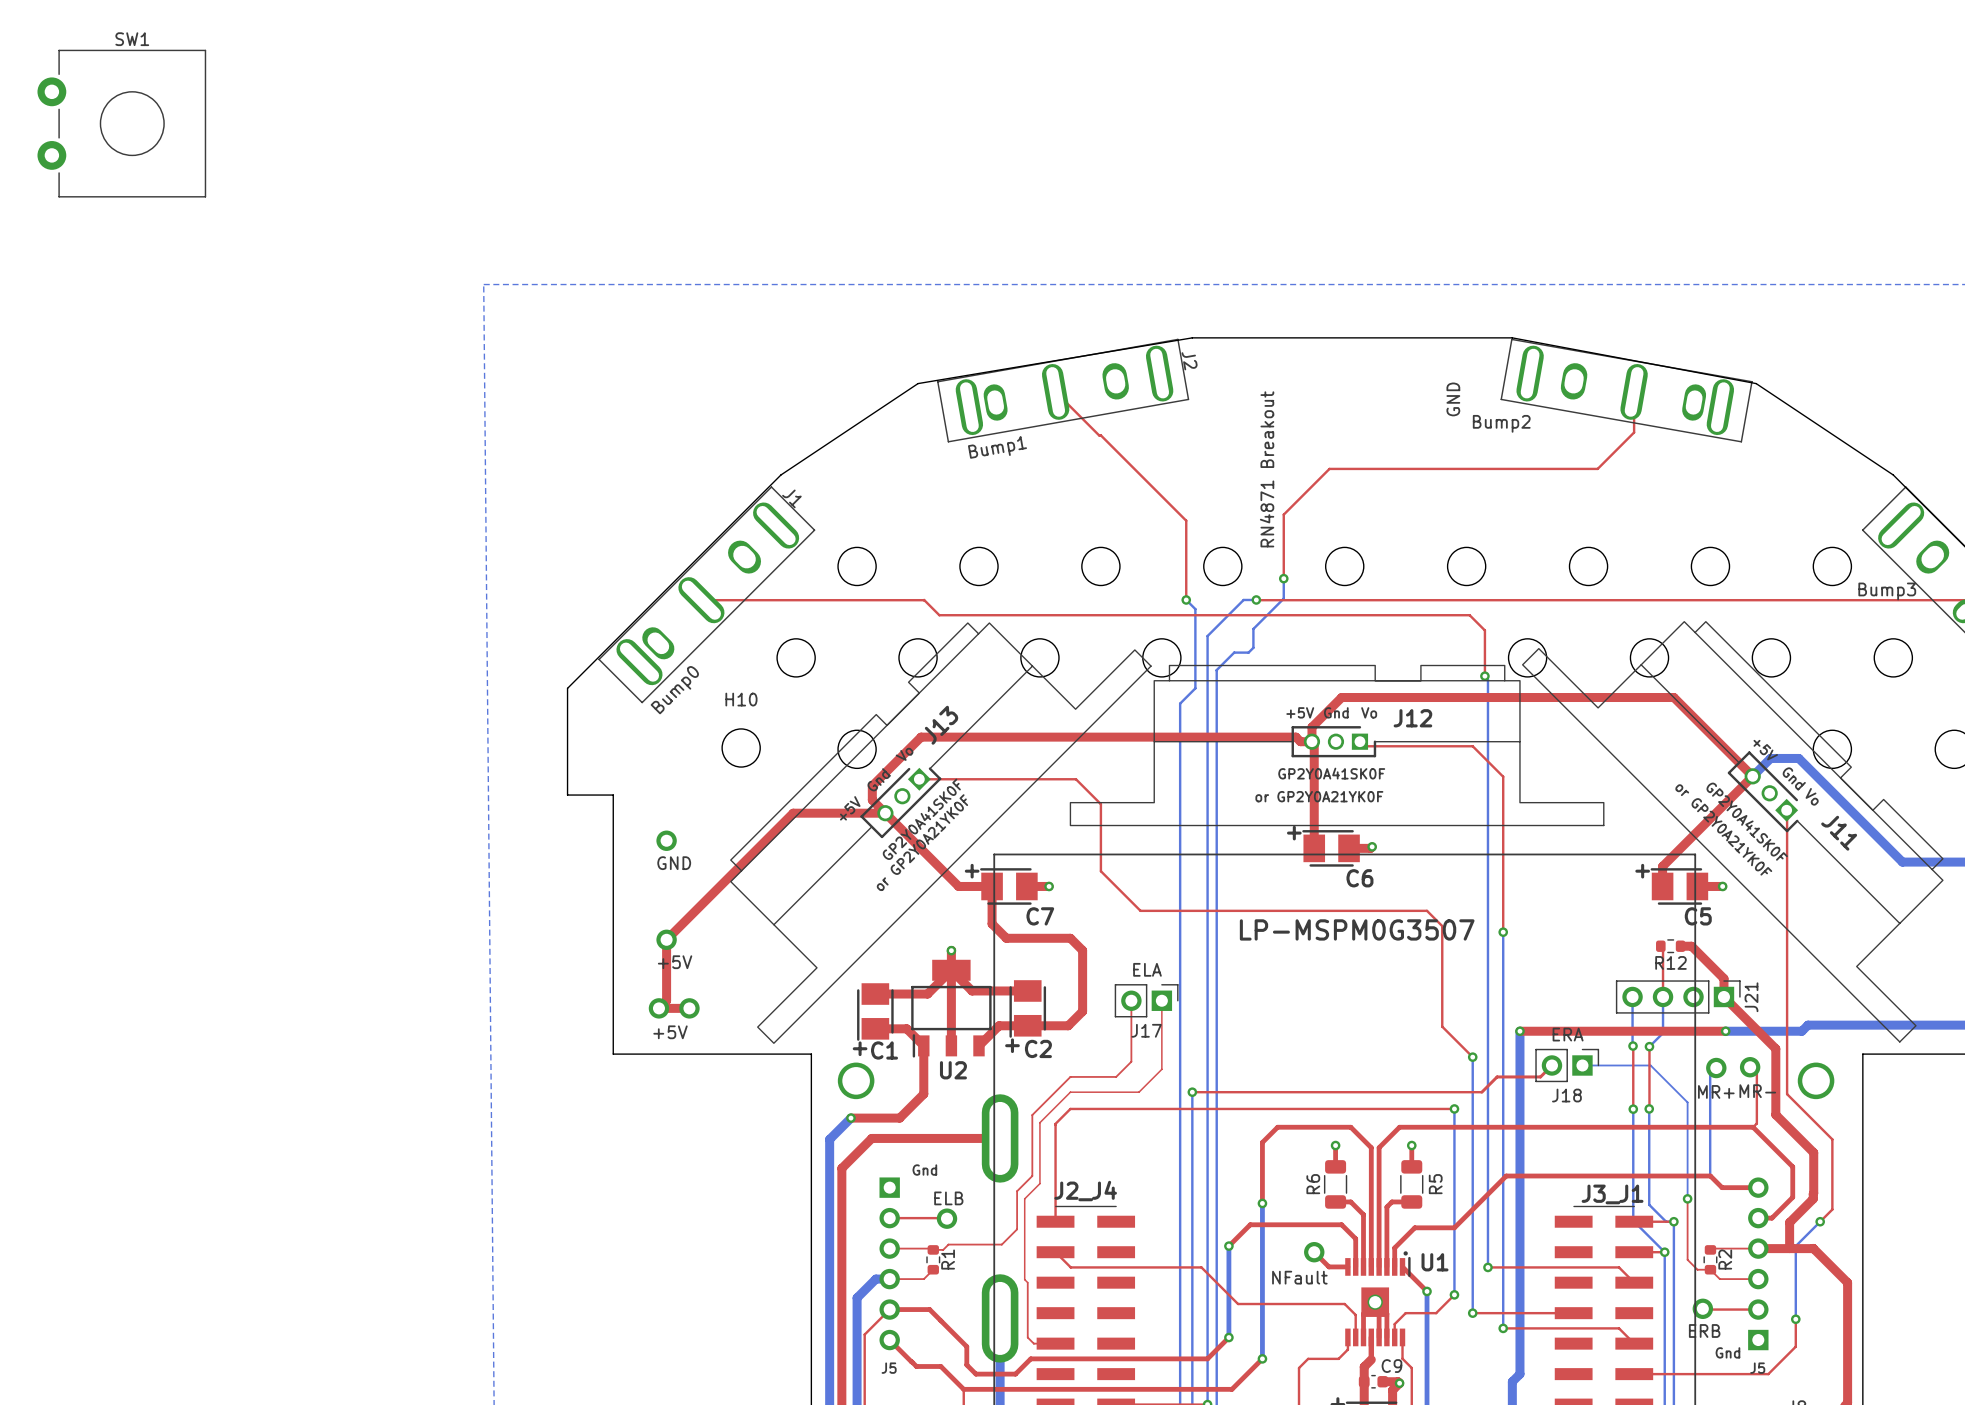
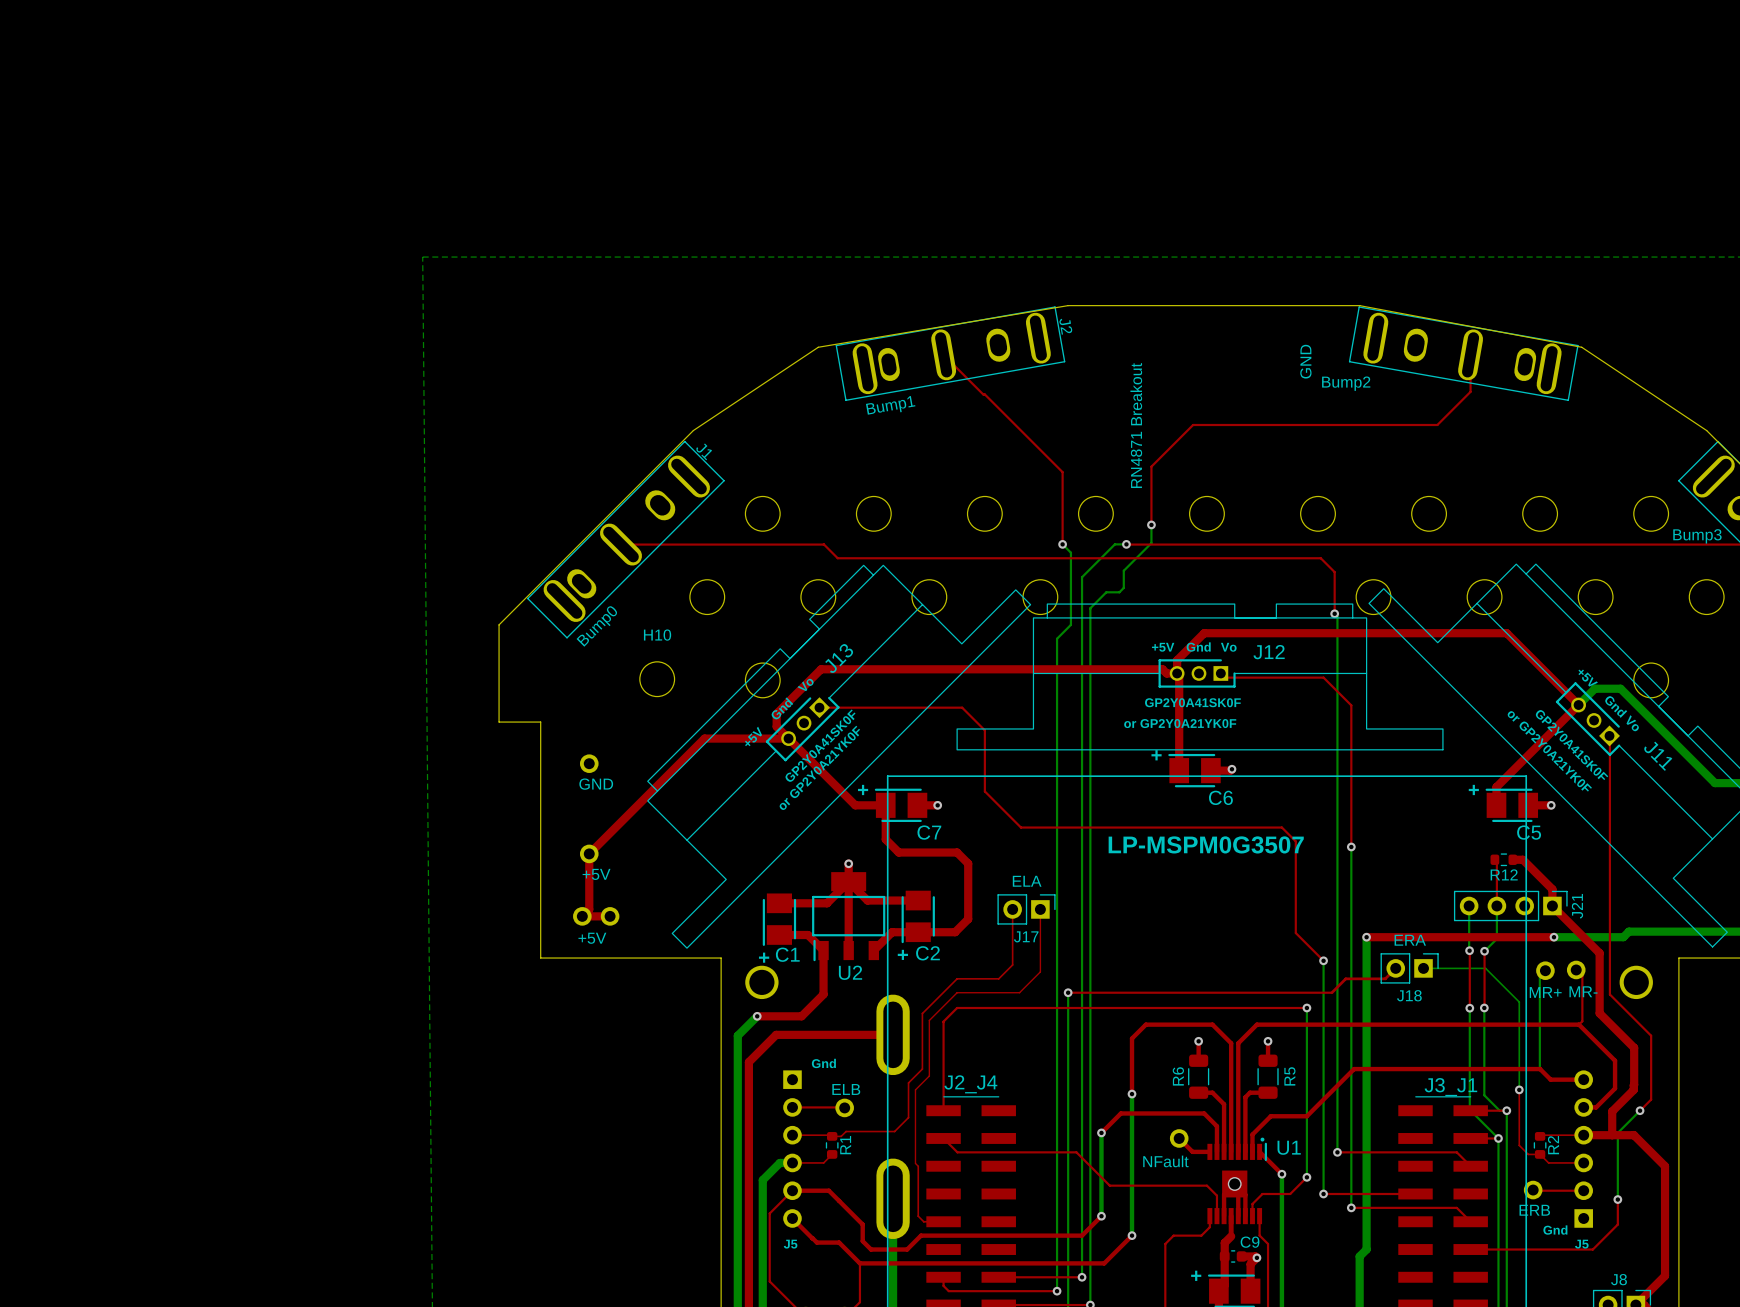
SW1: (121, 123) -> none

